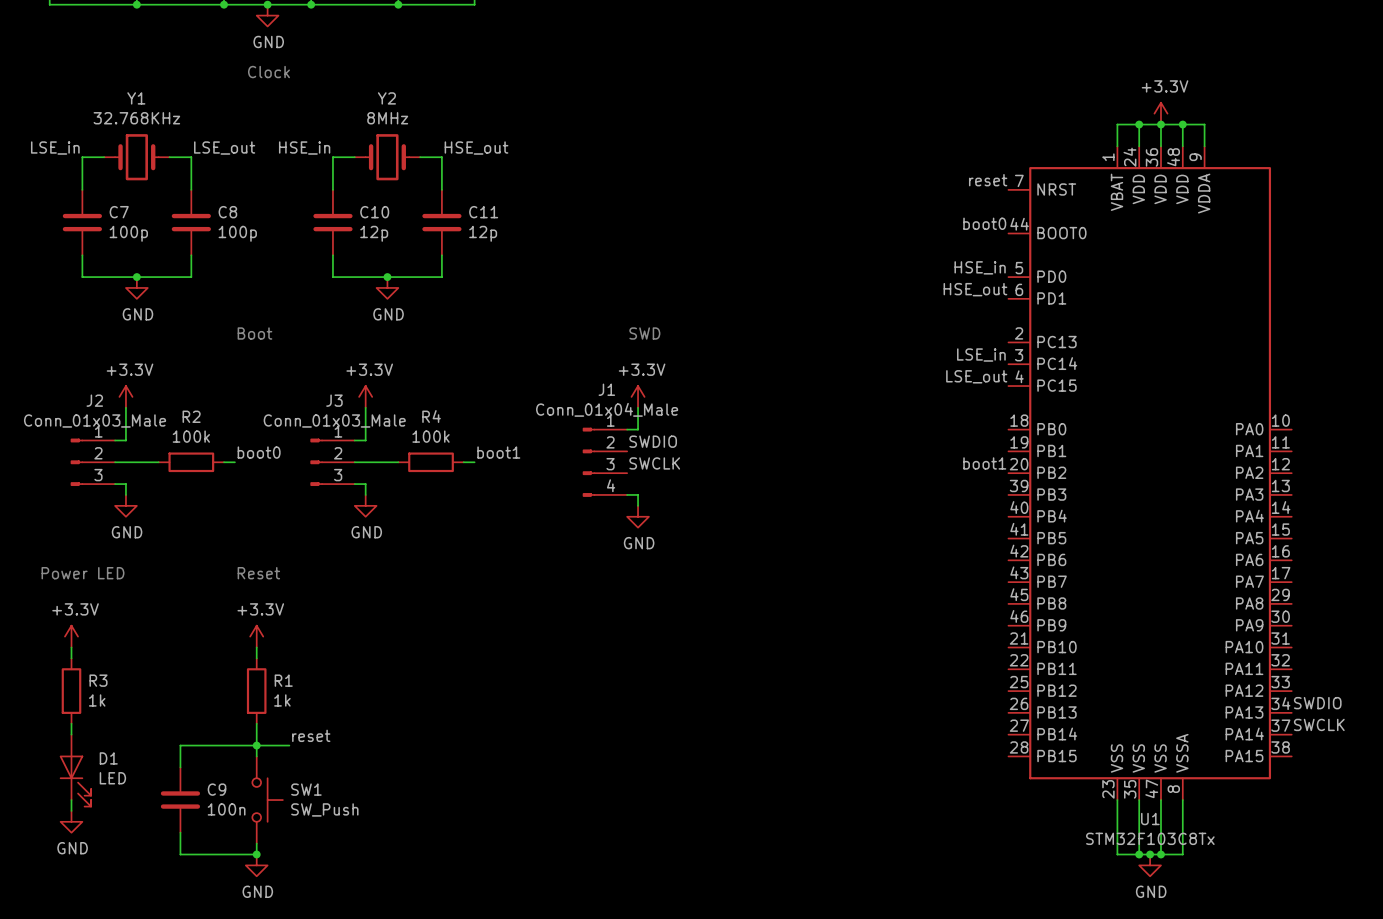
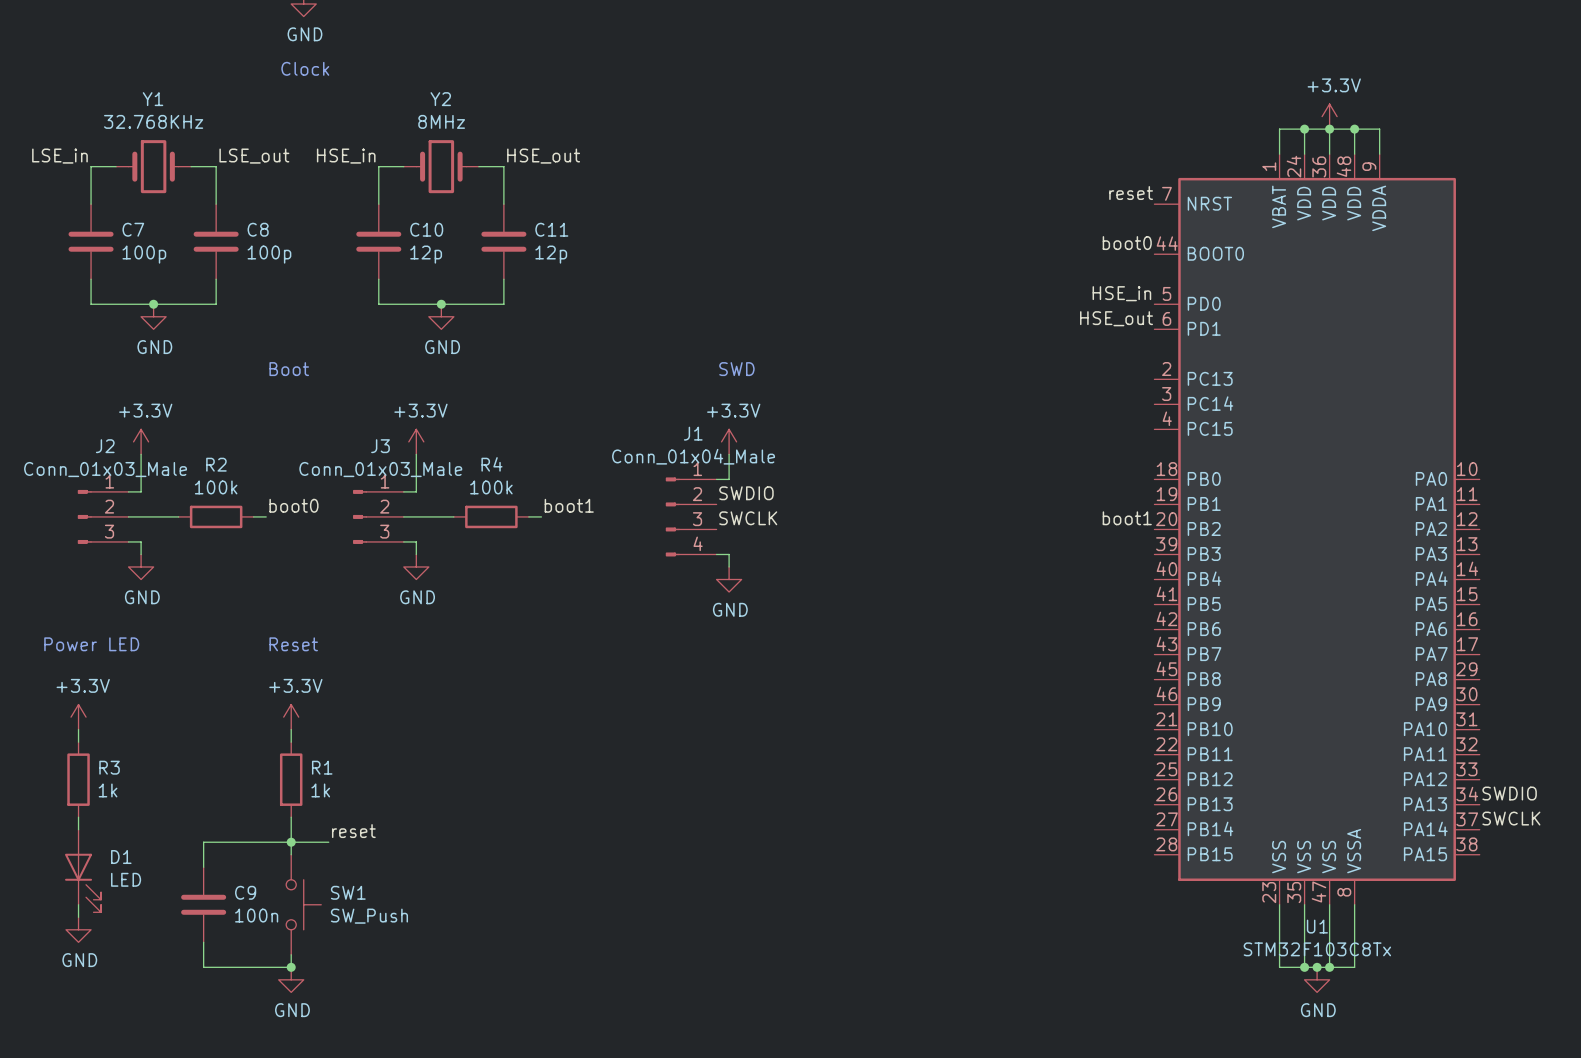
label: LSE_in (981, 355) -> none
label: LSE_out (976, 376) -> none

